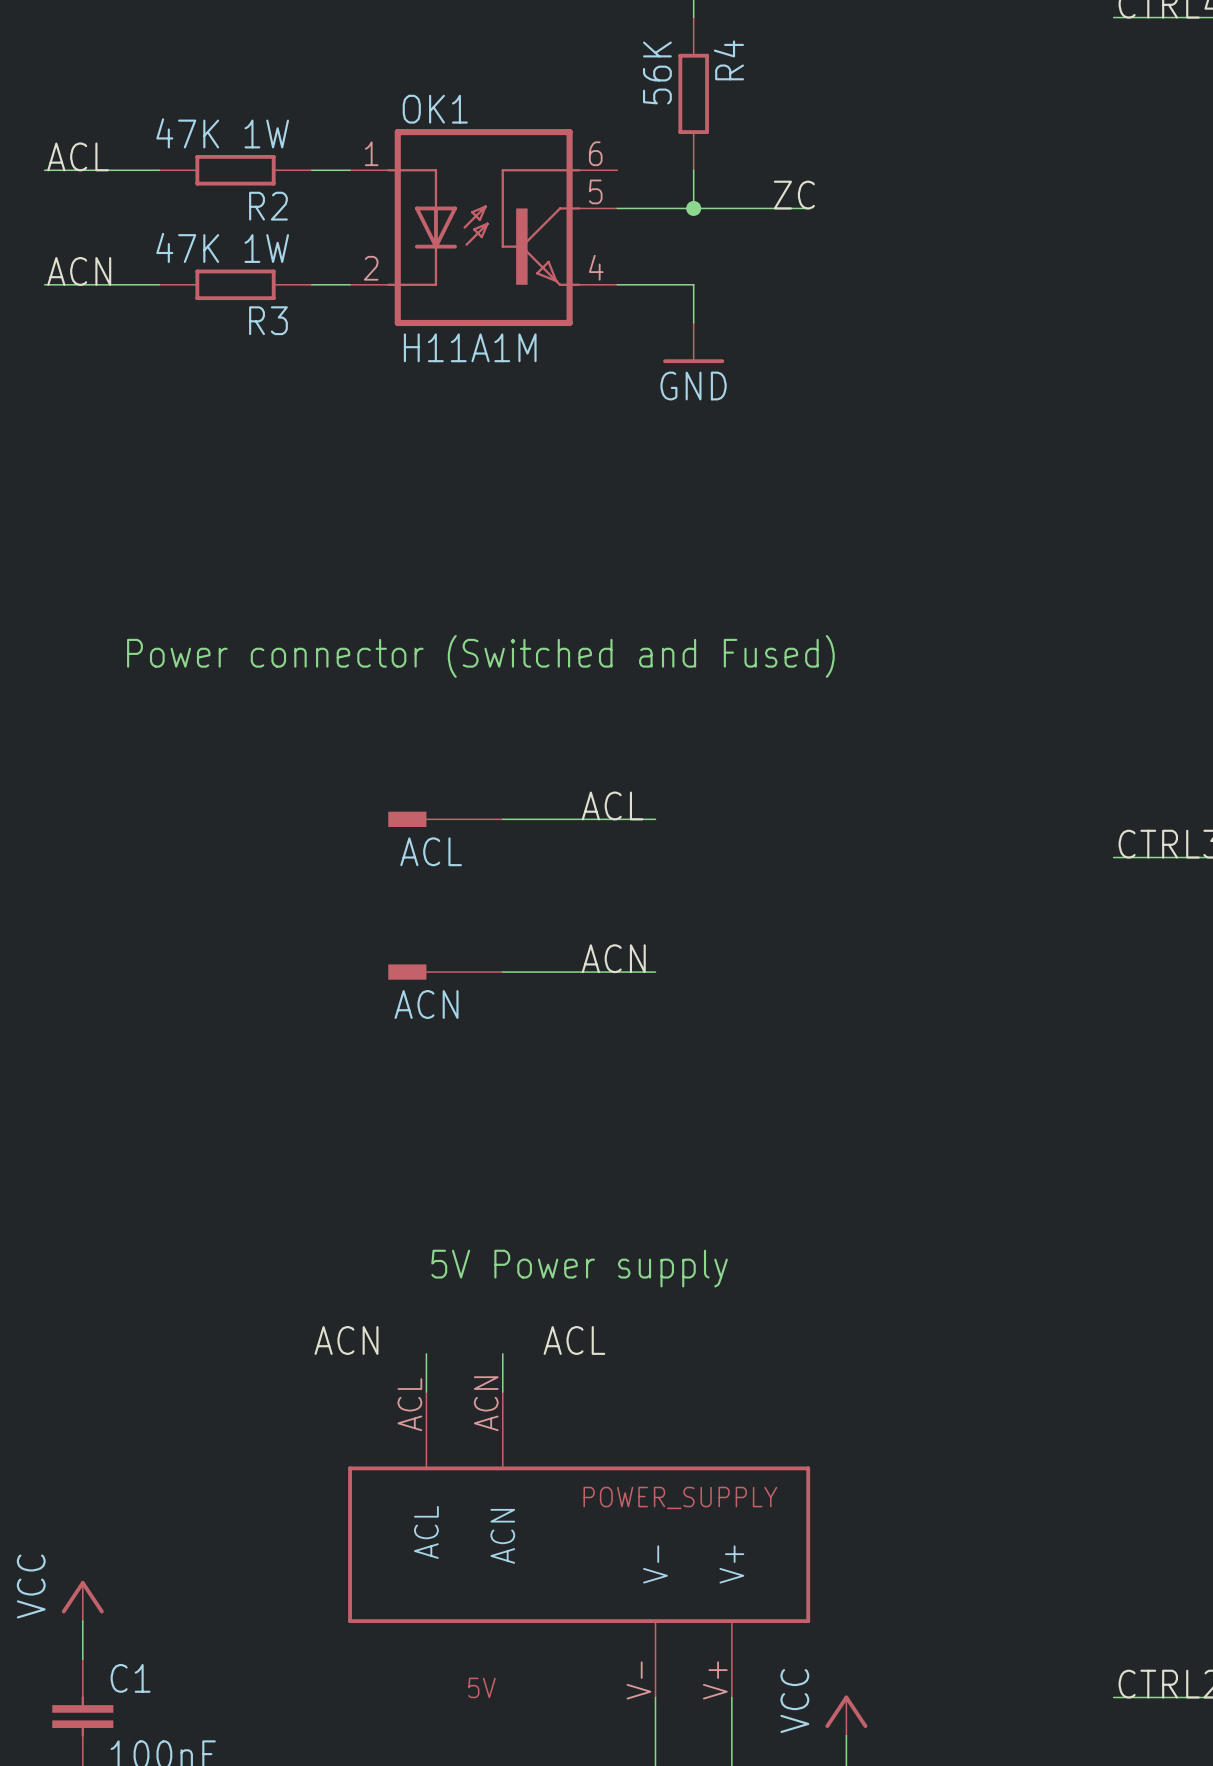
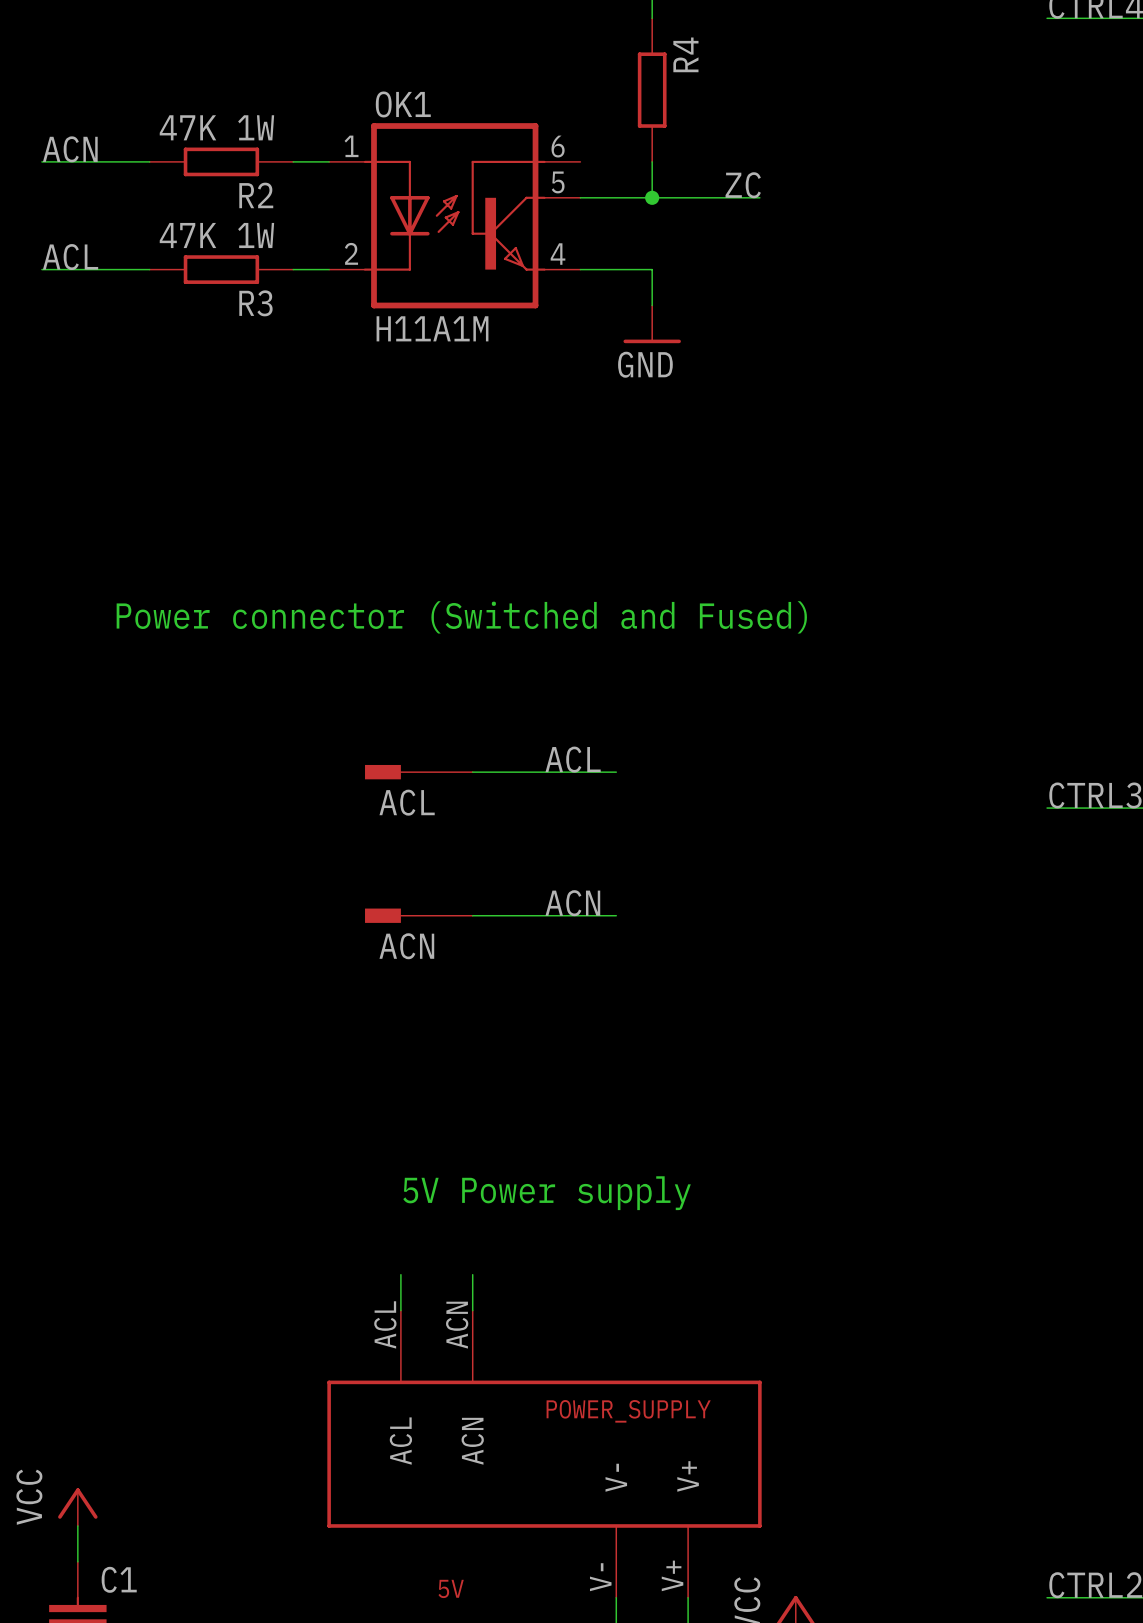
R4 value: 56K (657, 72) -> none
label: ACL (78, 156) -> ACN (70, 149)
label: ACN (79, 271) -> ACL (70, 257)
label: ACN (346, 1340) -> none
label: ACL (574, 1340) -> none

